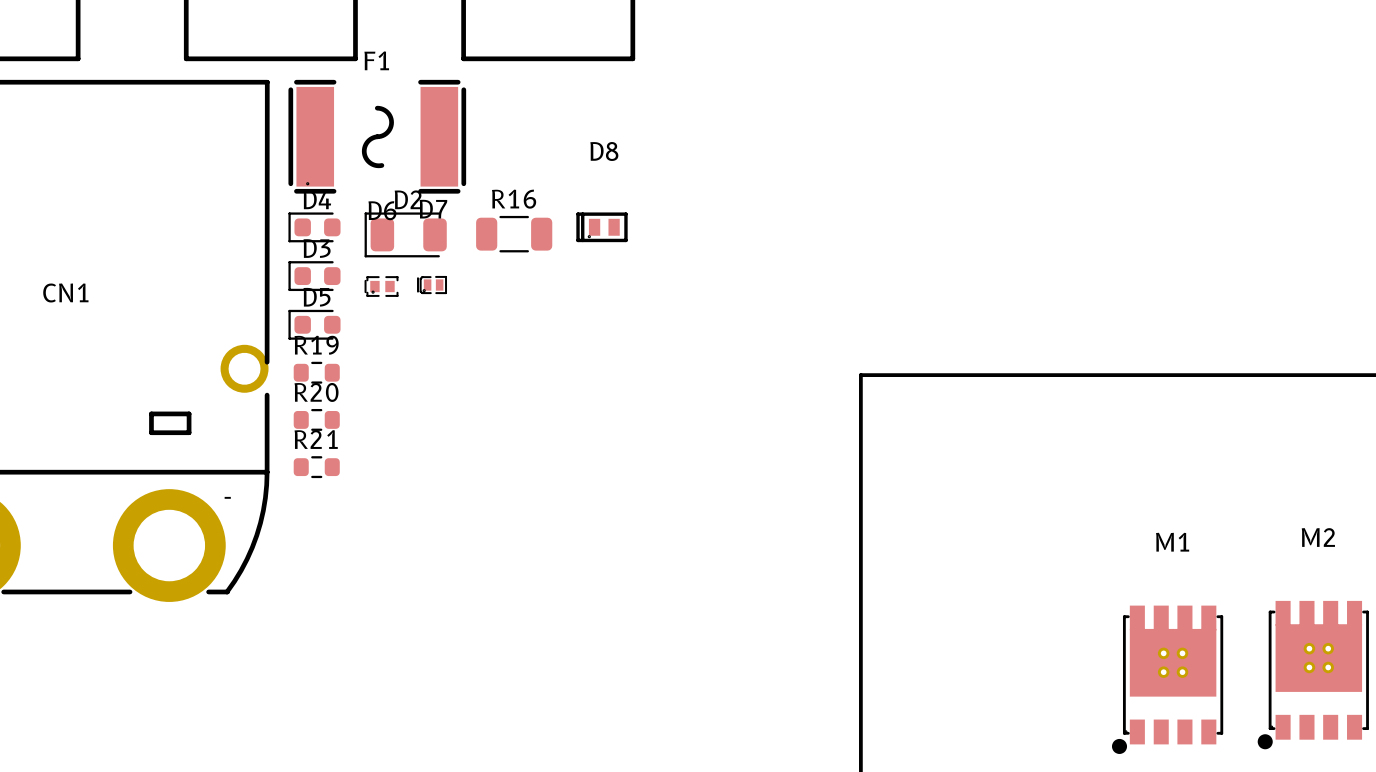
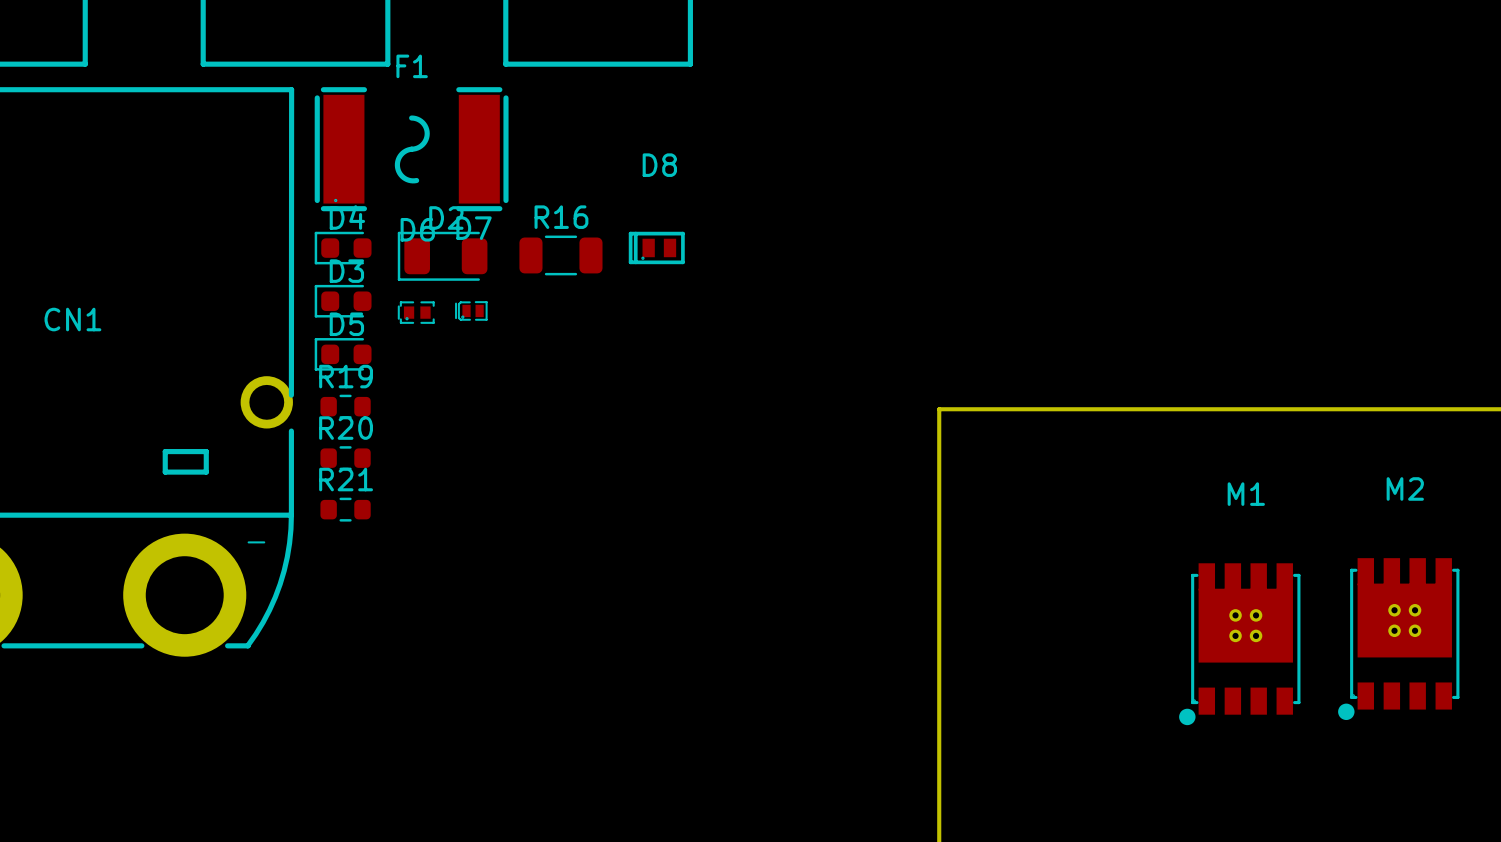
M2 position: (1313, 675) -> (1398, 639)
M1 position: (1167, 679) -> (1239, 644)

